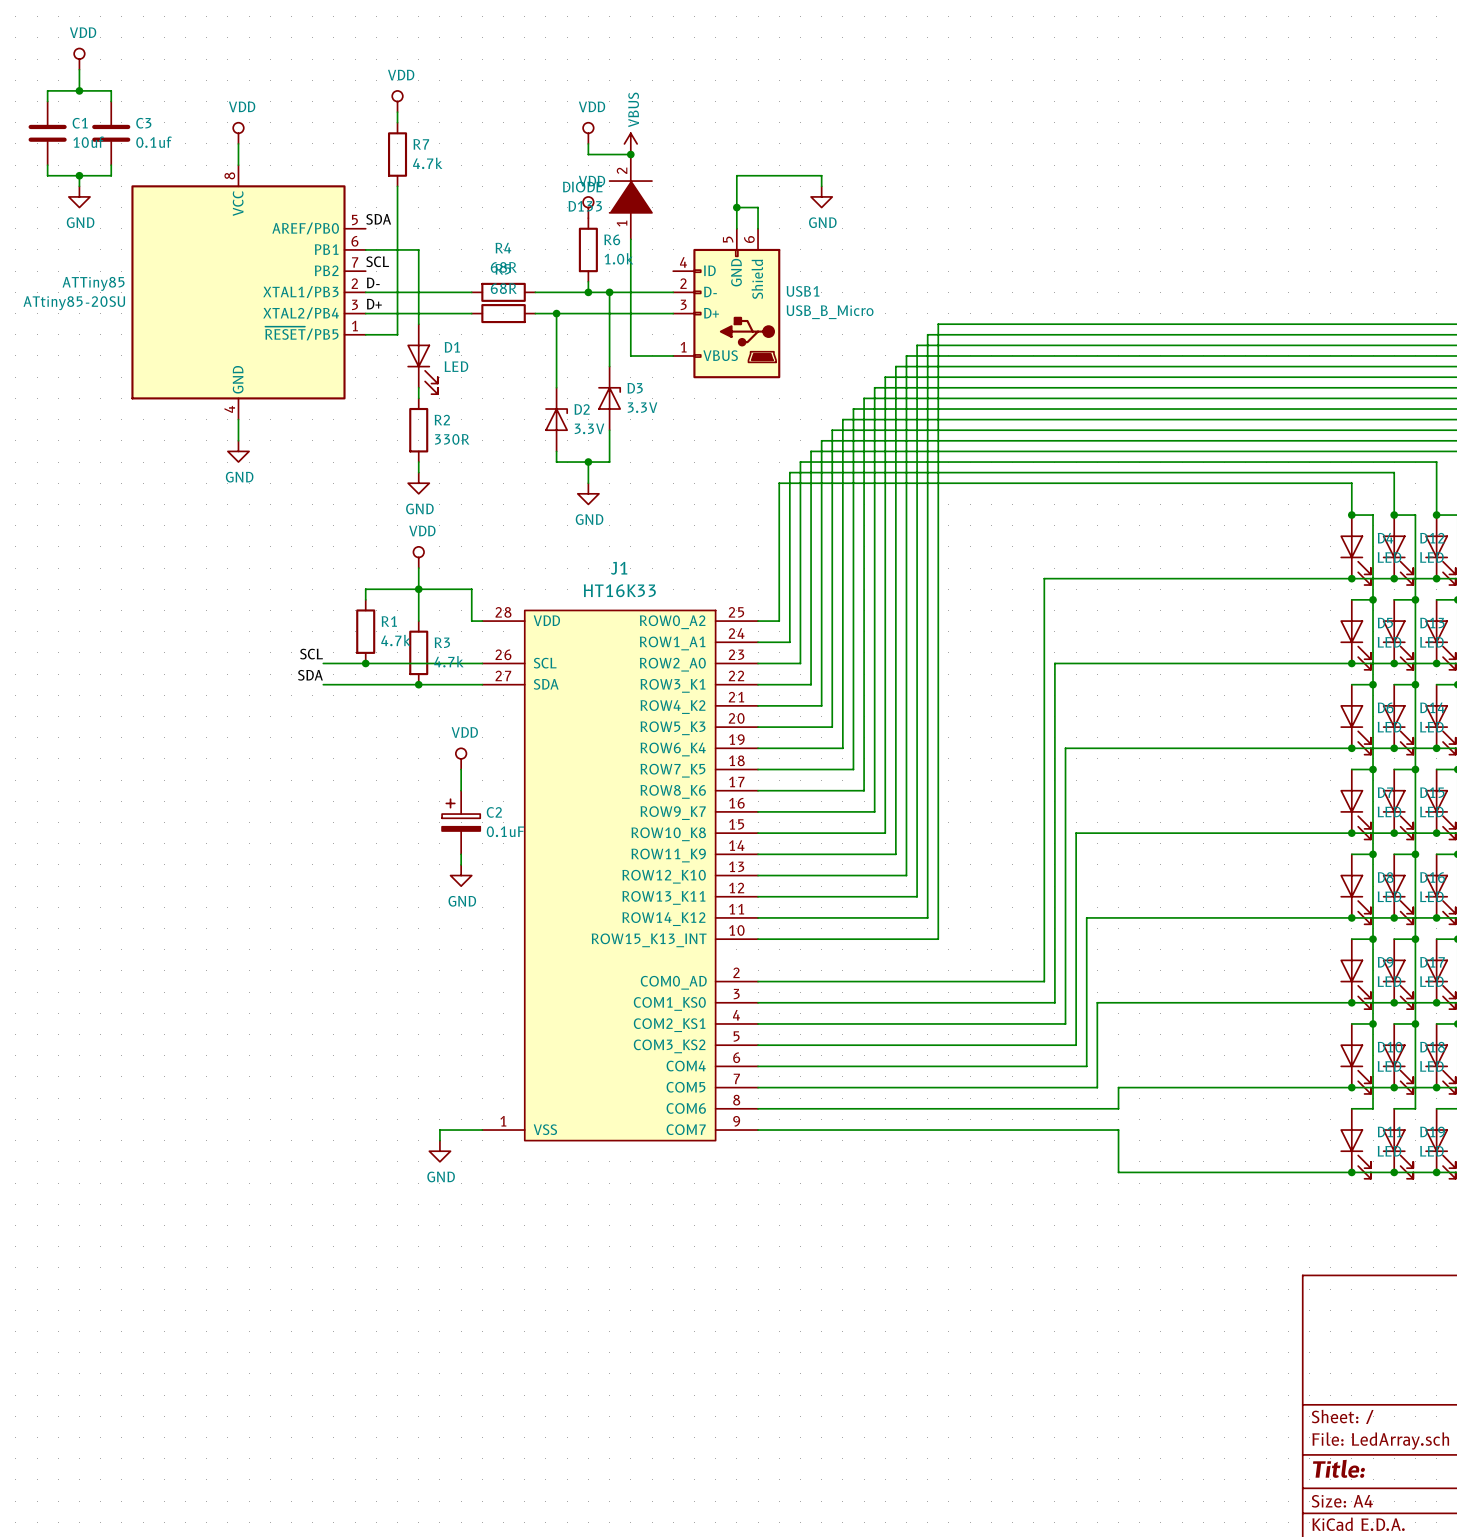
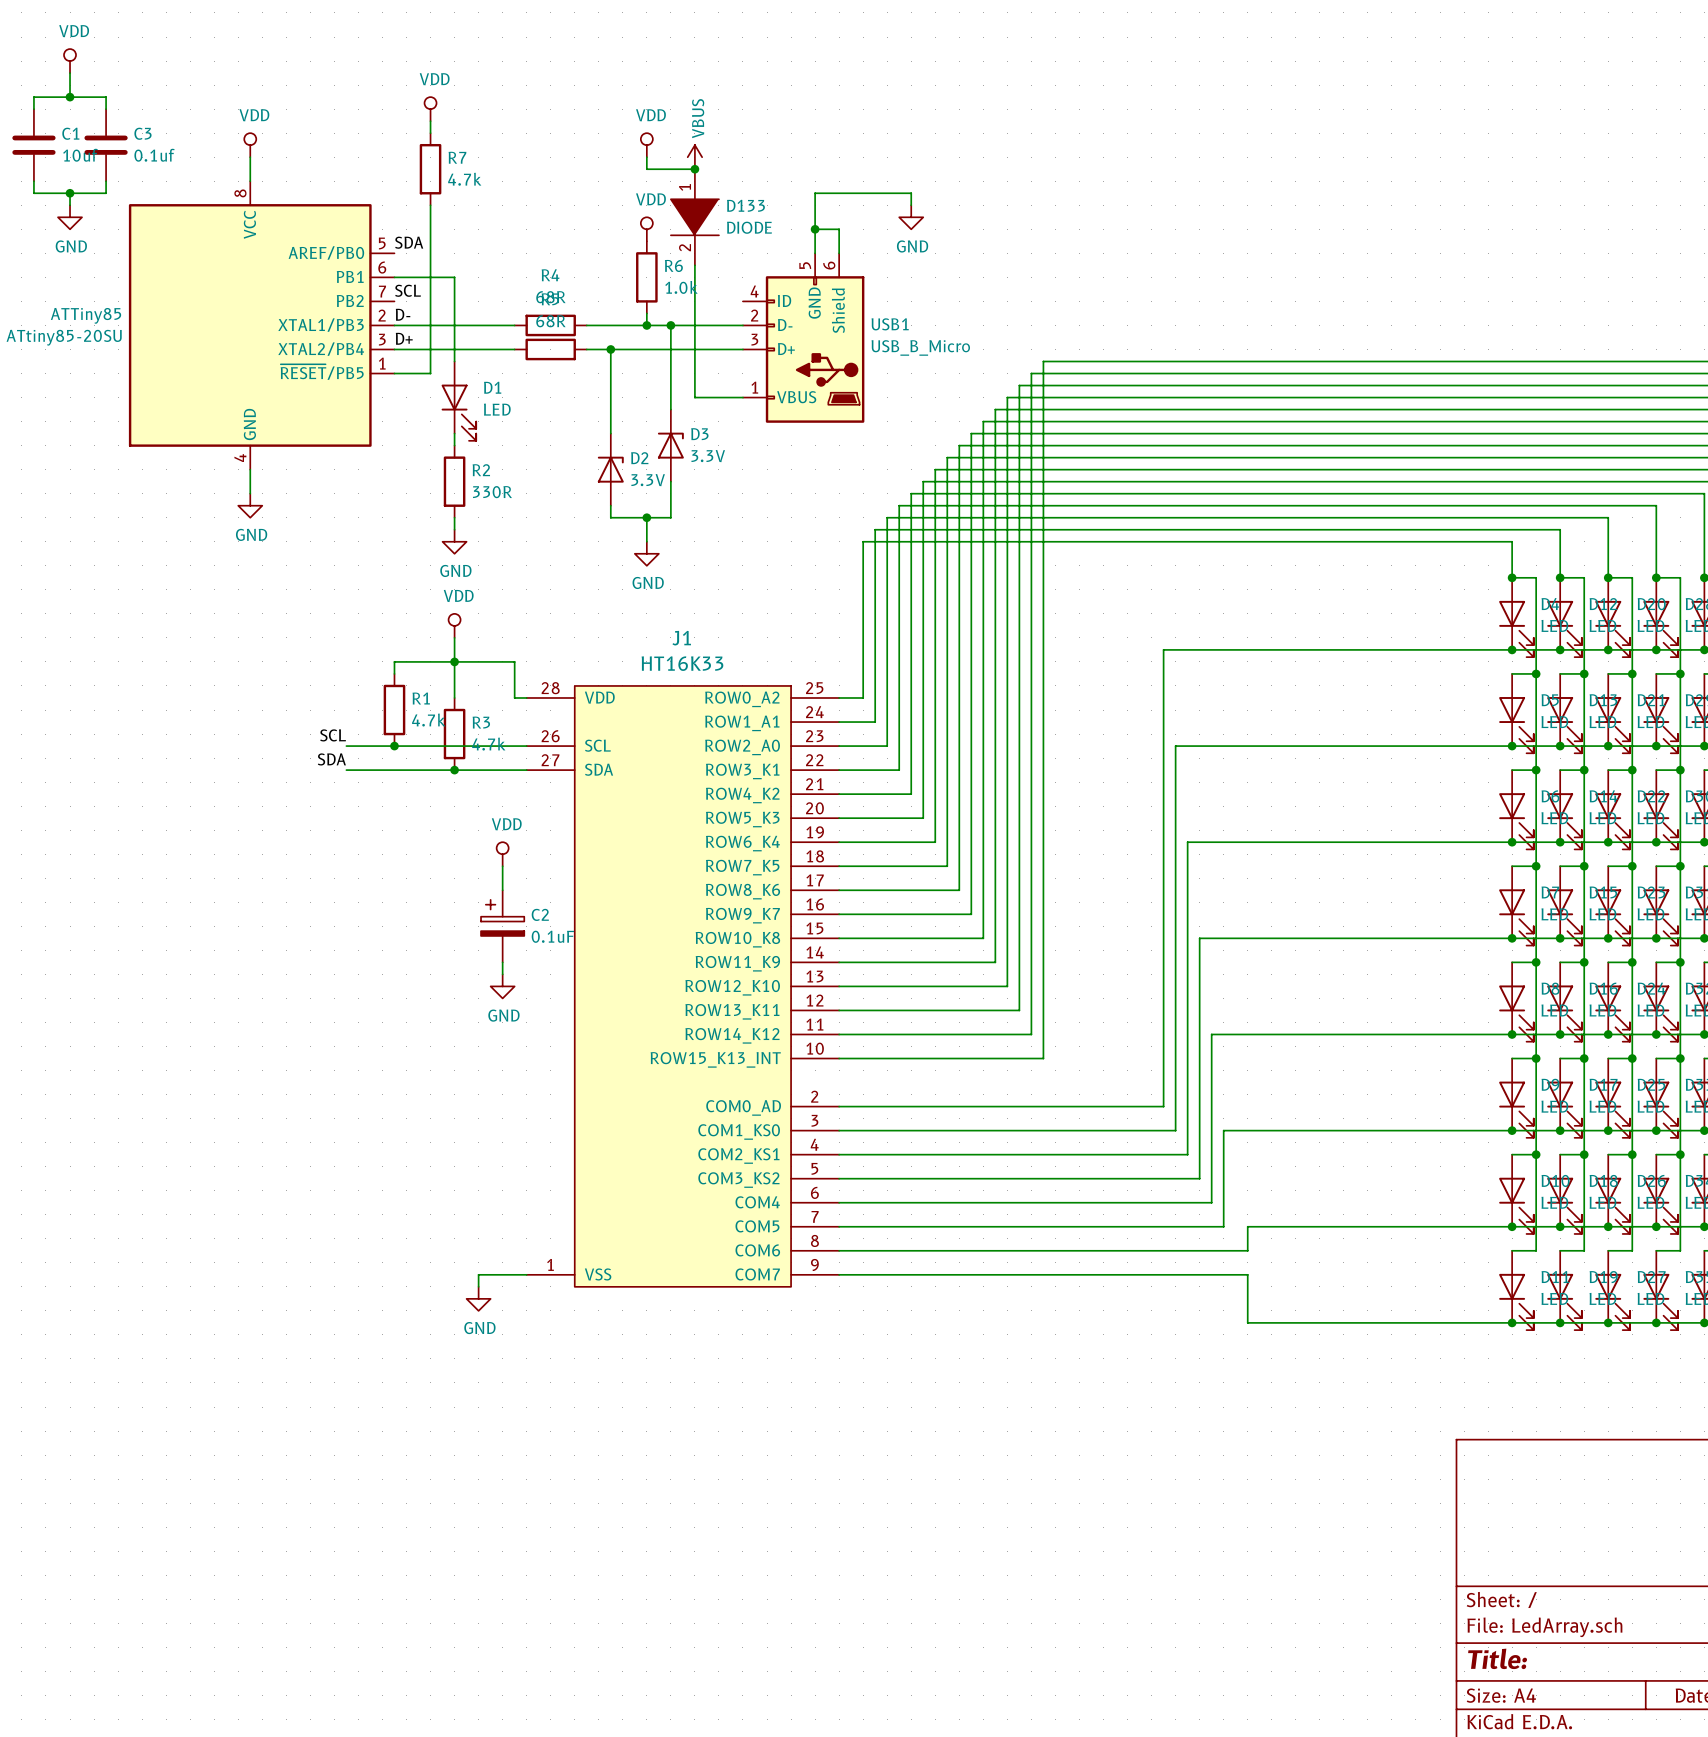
D133 rotation: 0° (630, 196) -> 180° (694, 217)

